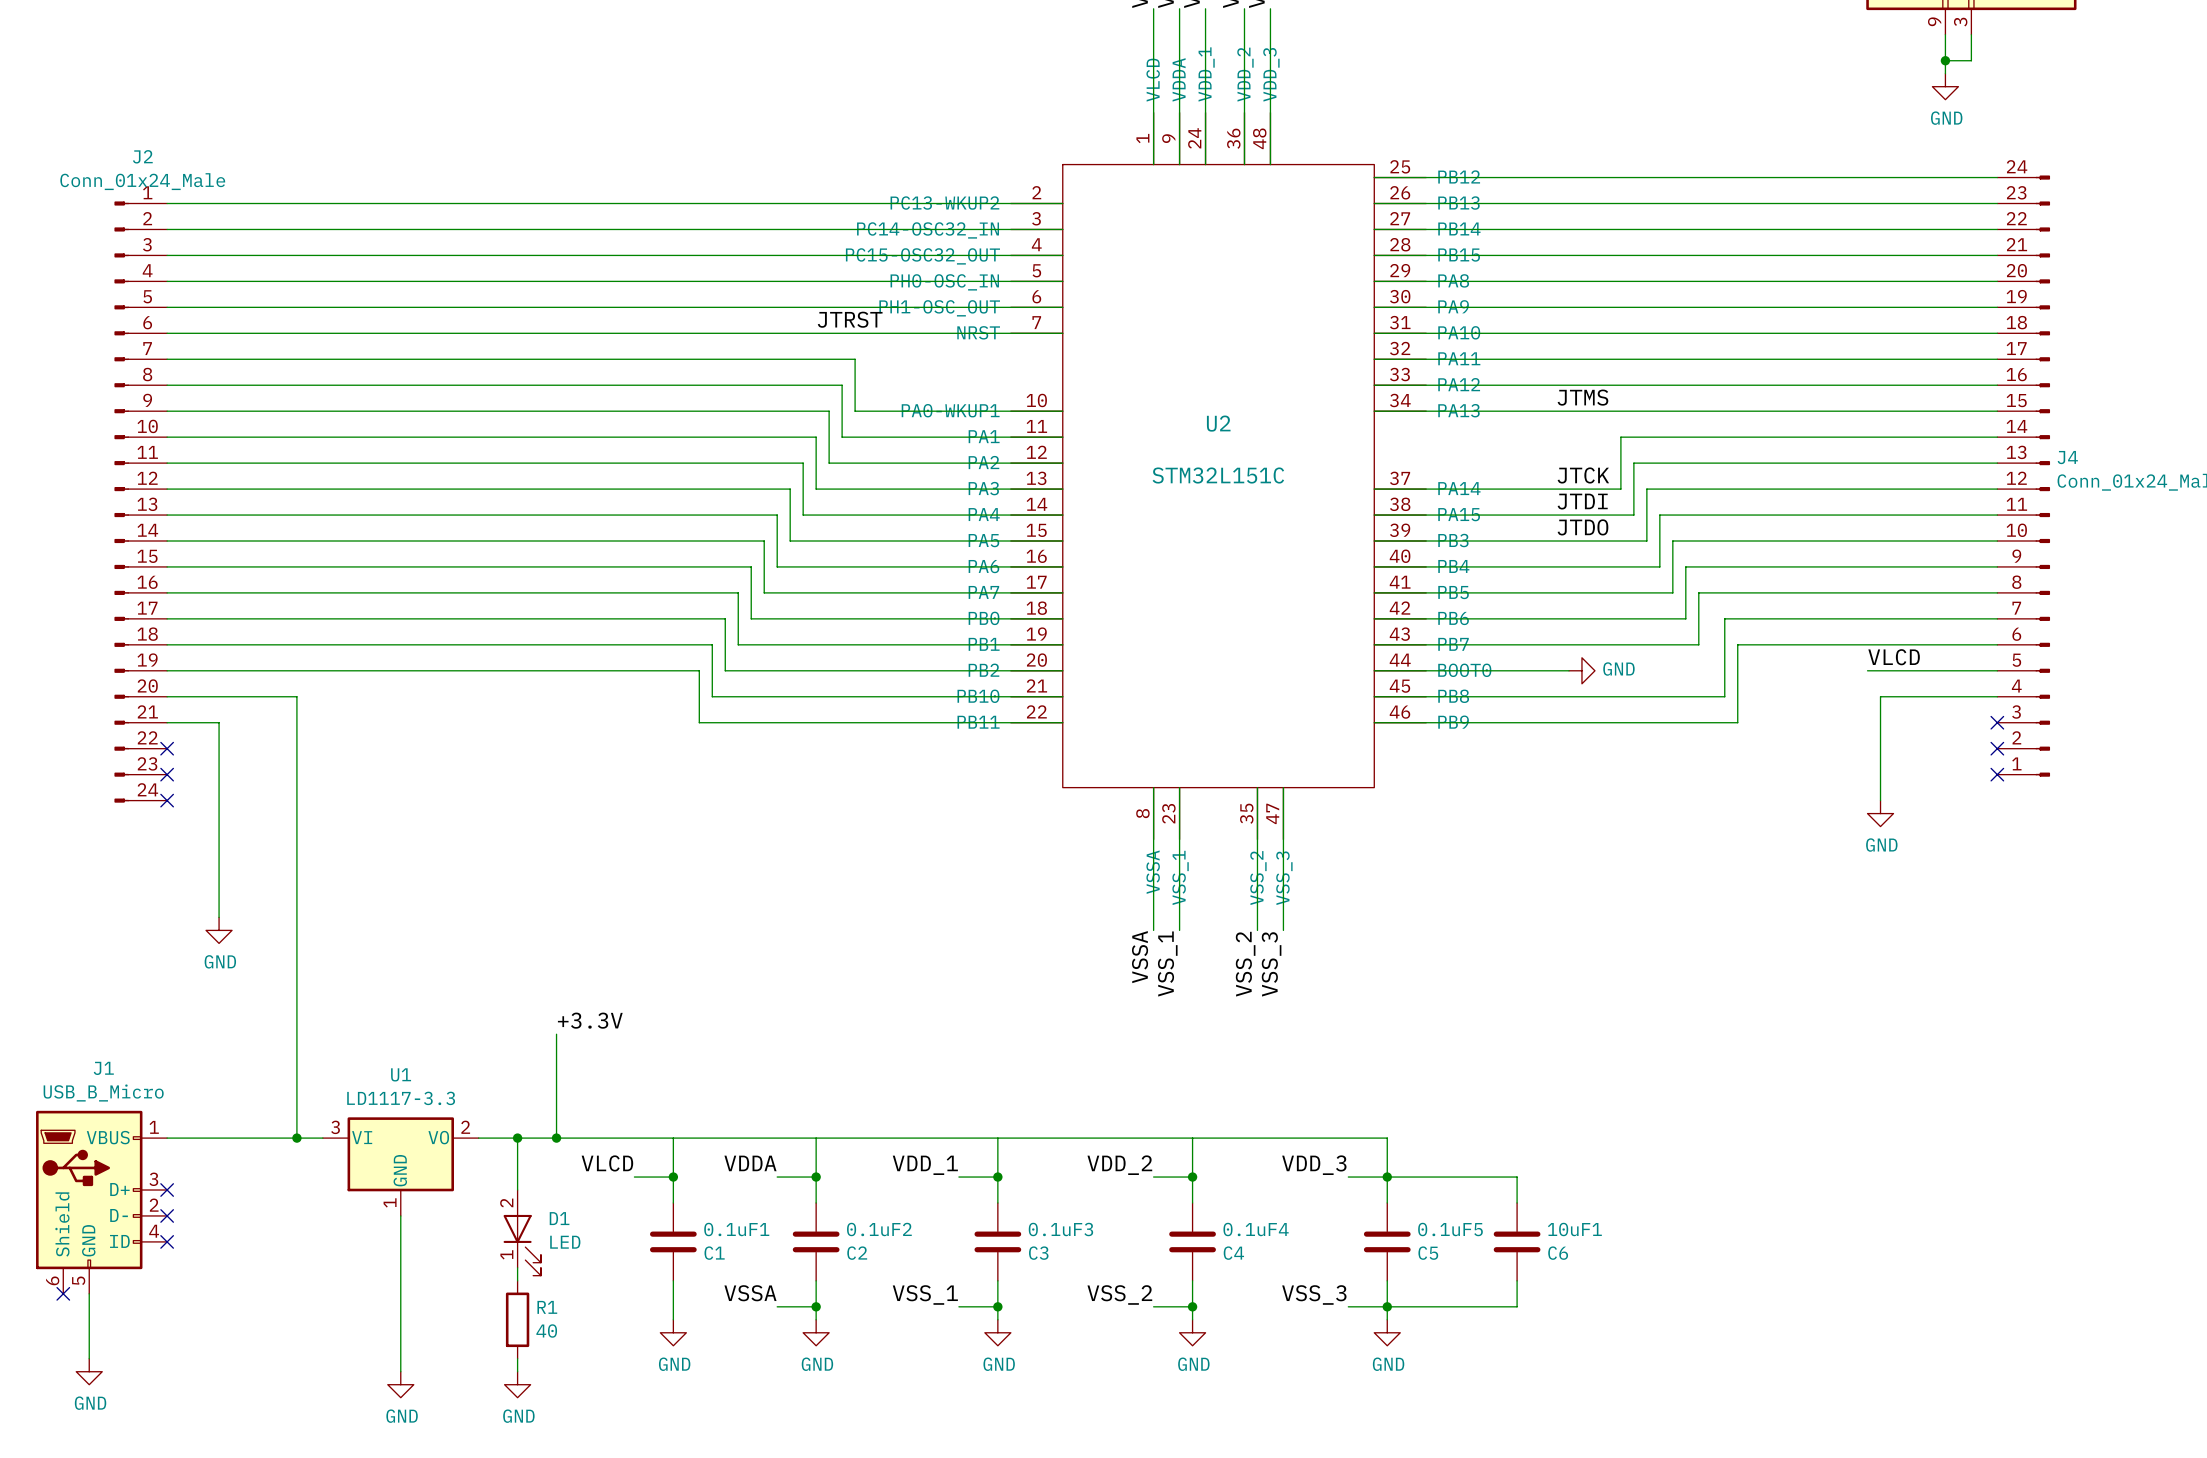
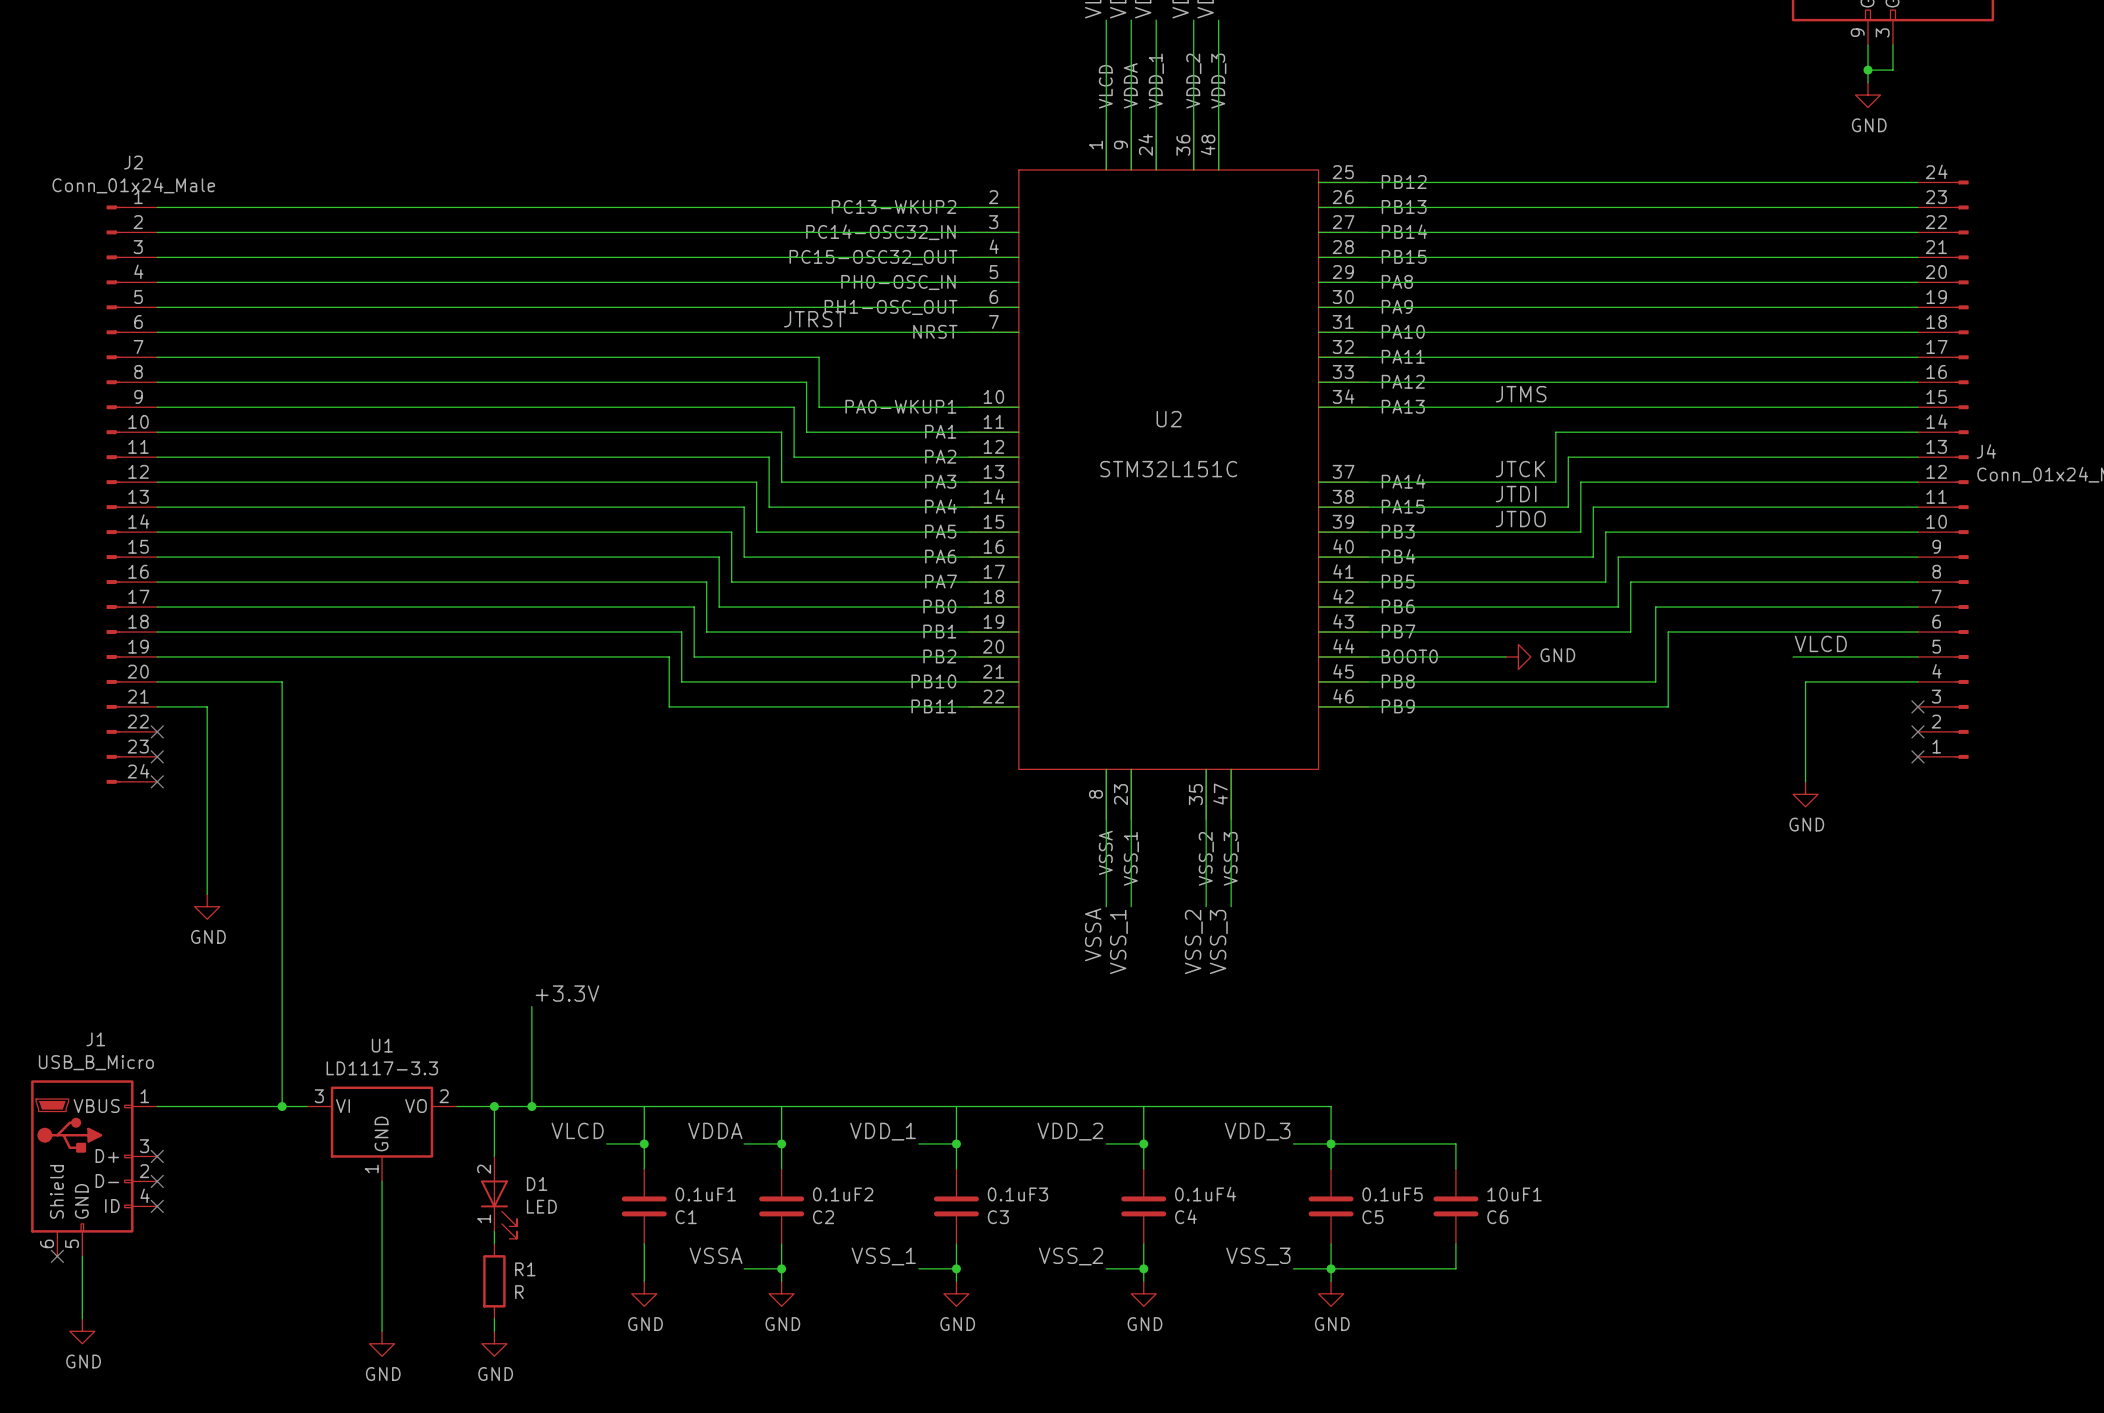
R1 value: 40 (546, 1331) -> R (519, 1292)

